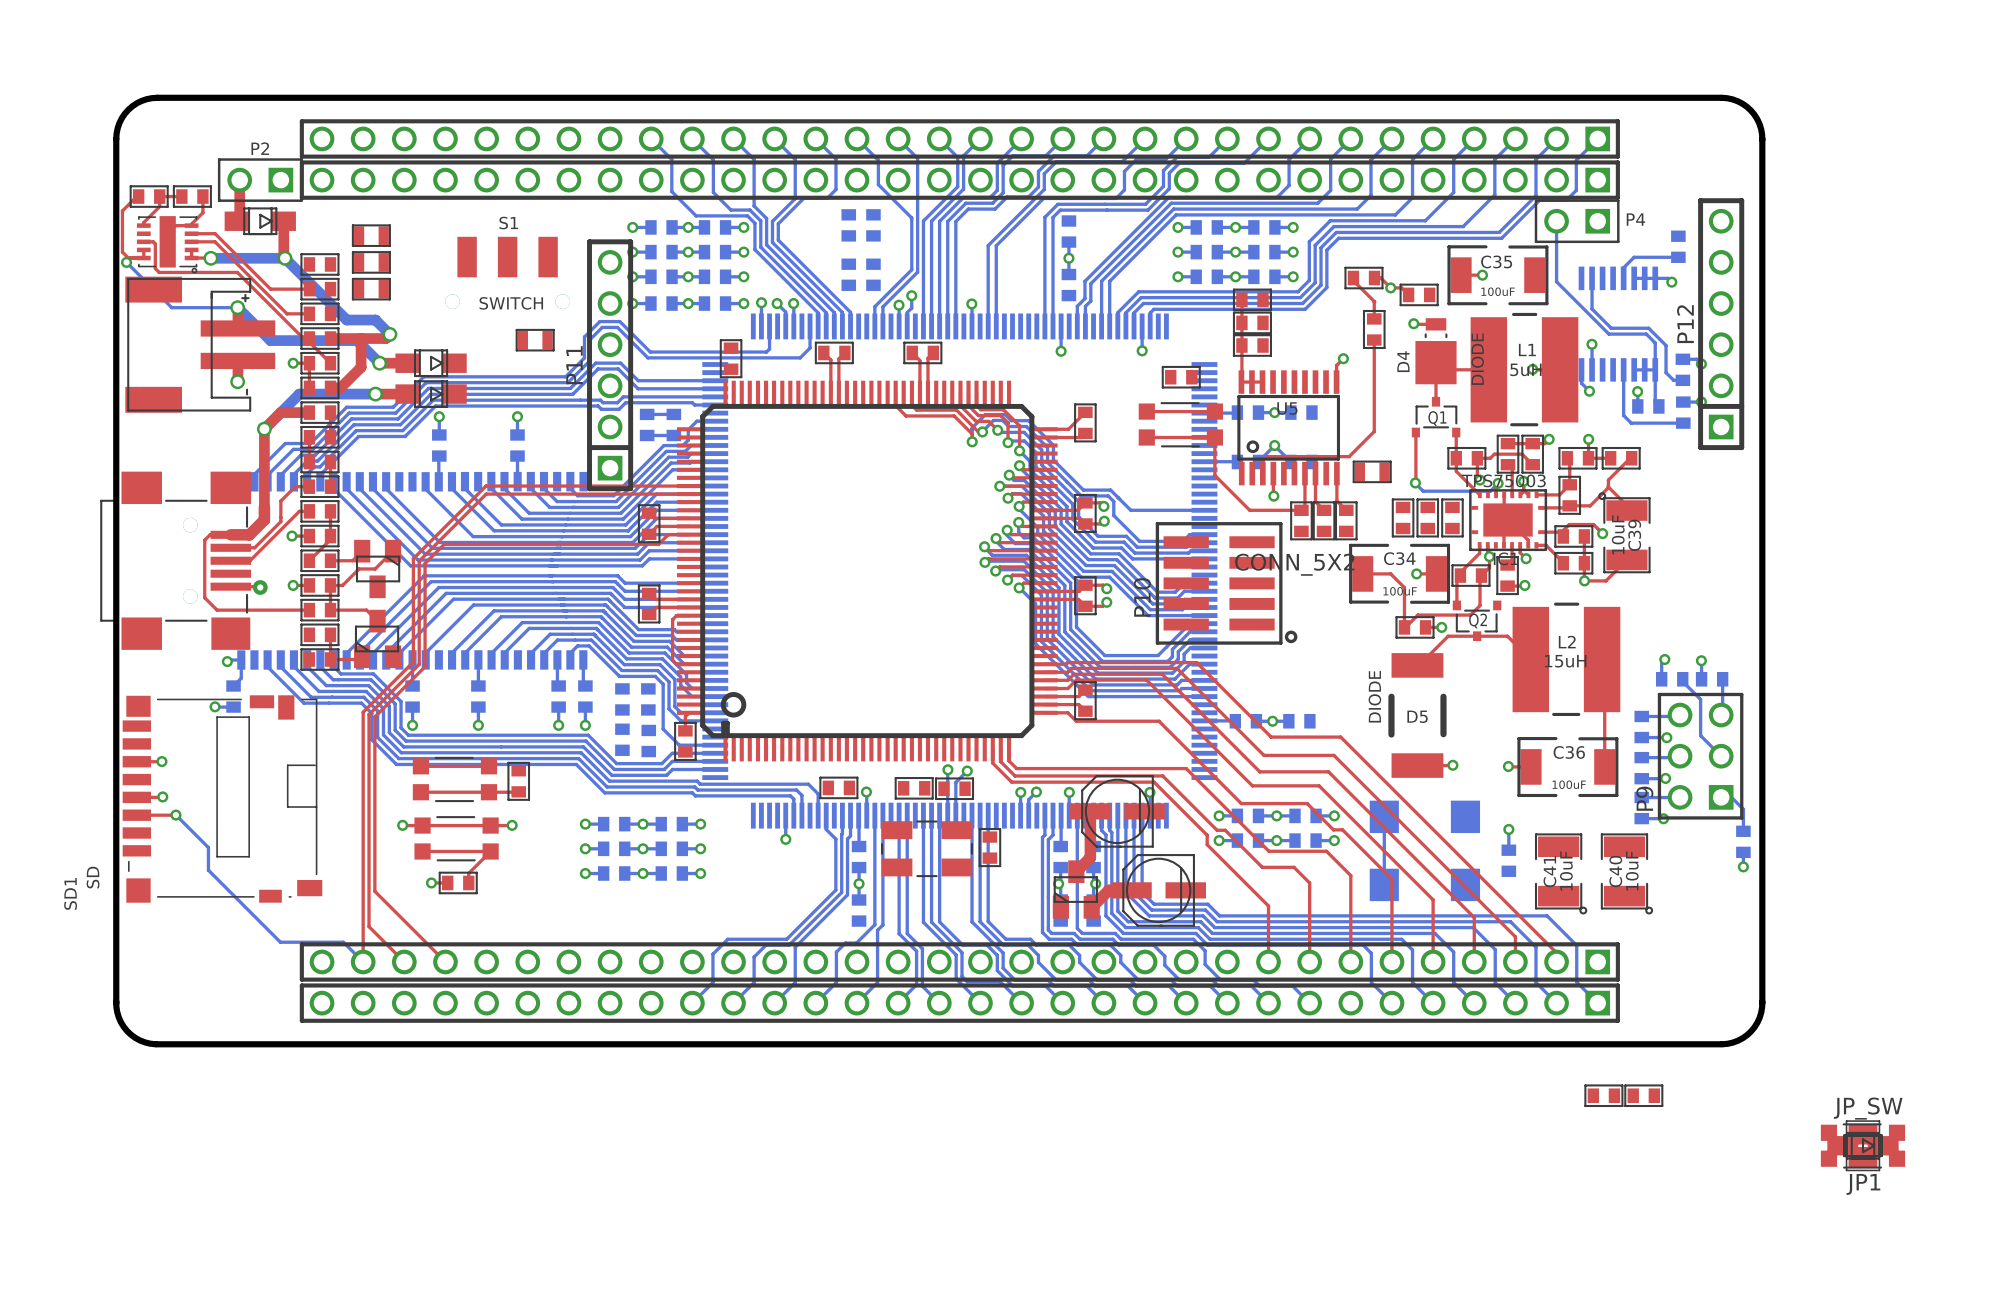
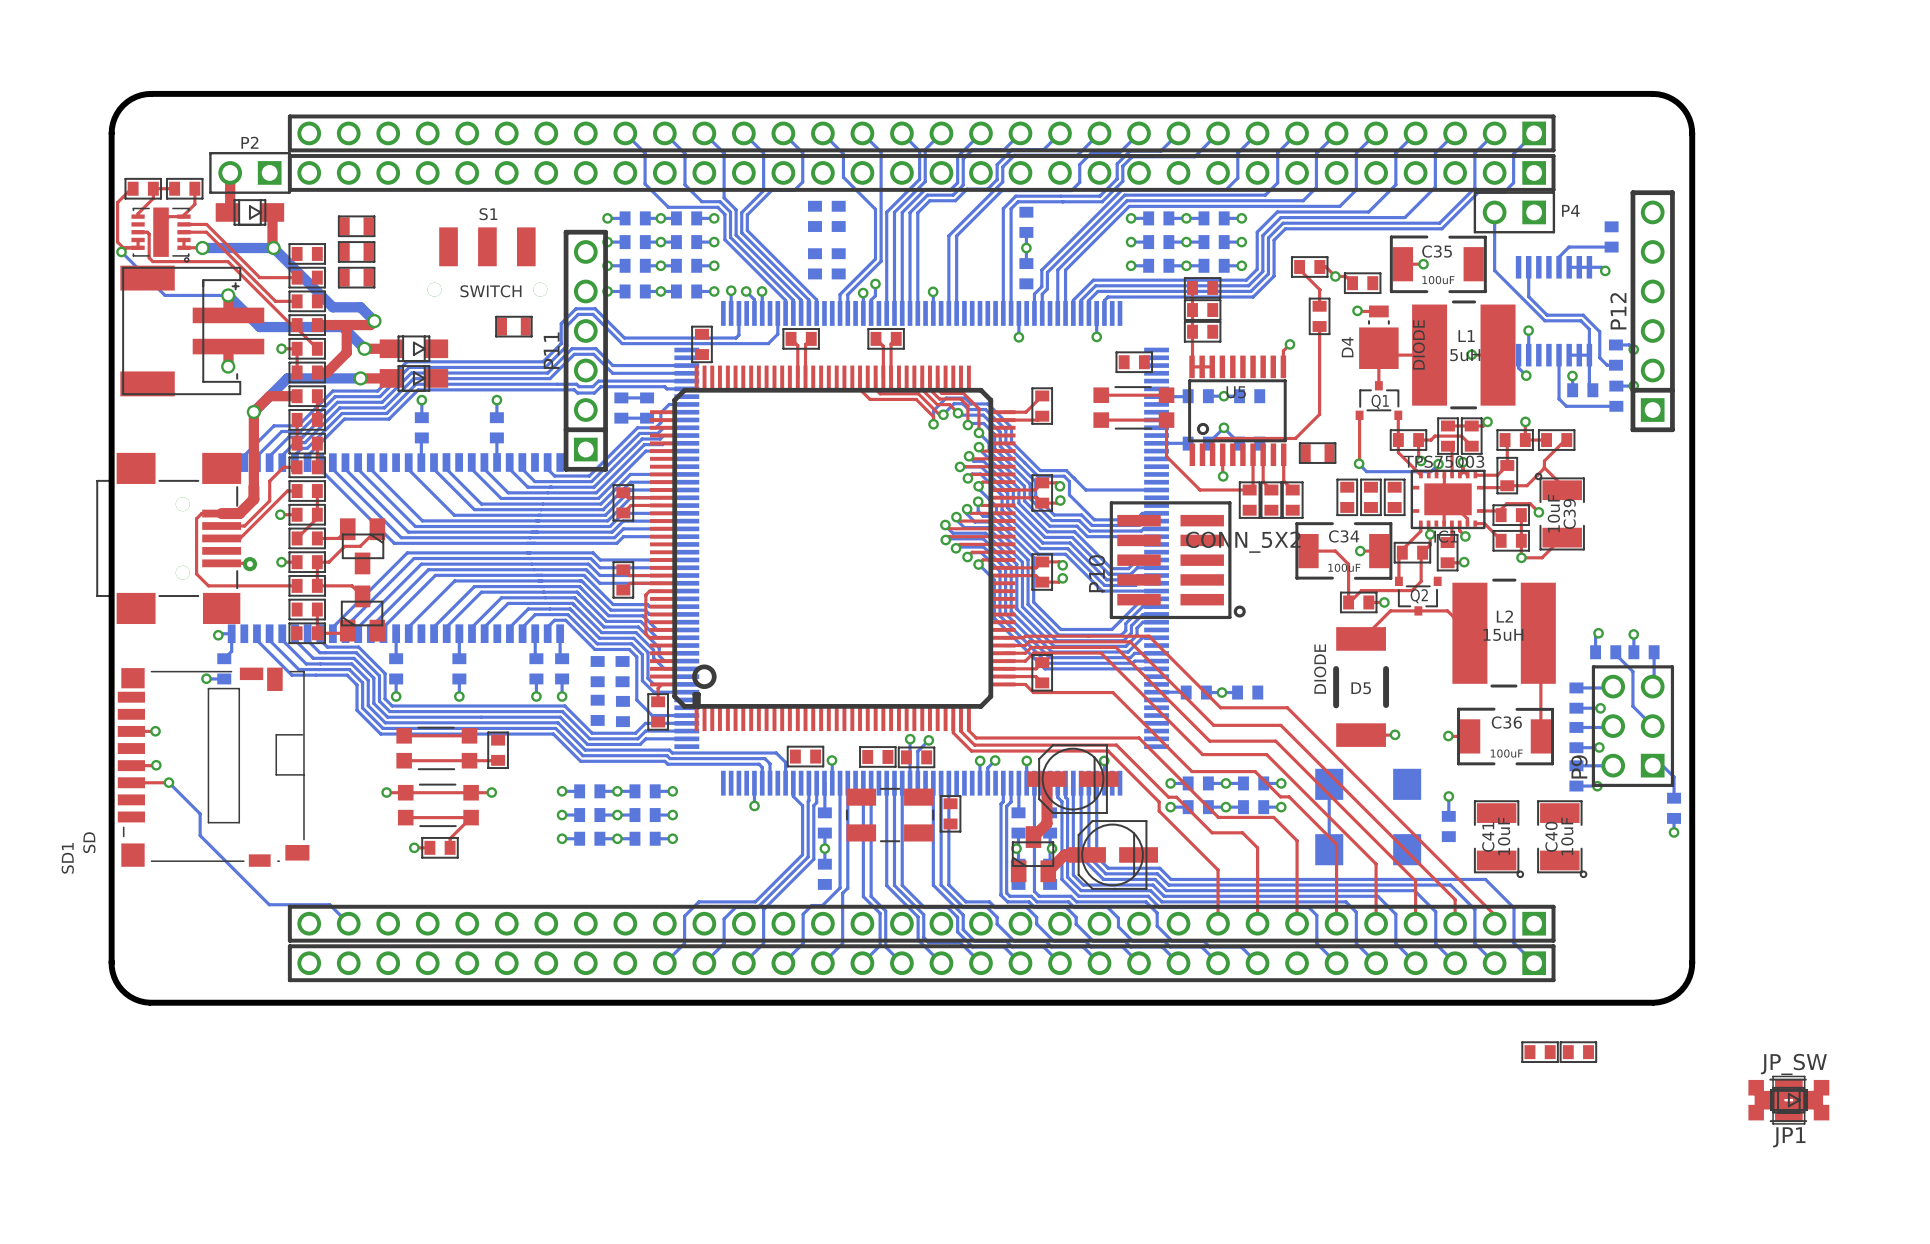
top track: (689, 486) (486, 486) (413, 558) (413, 661) (363, 712) (363, 961) -> none
top track: (689, 494) (486, 494) (419, 561) (419, 664) (369, 714) (369, 926) (404, 961) -> none
top track: (689, 534) (668, 534) (658, 544) (444, 544) (425, 563) (425, 666) (374, 716) (374, 891) (445, 961) -> none

